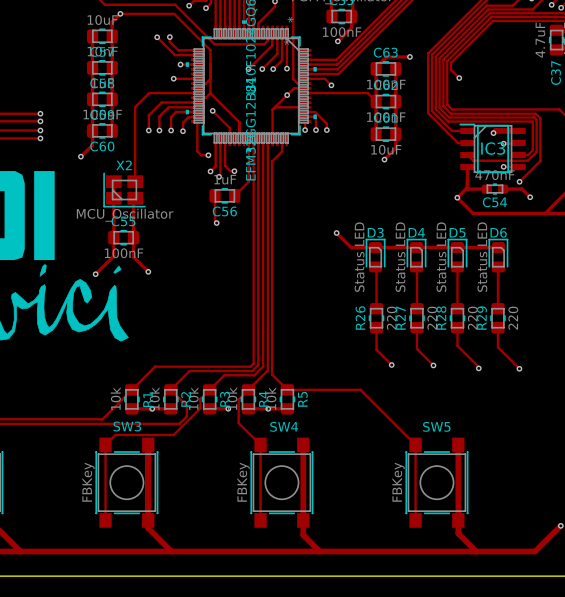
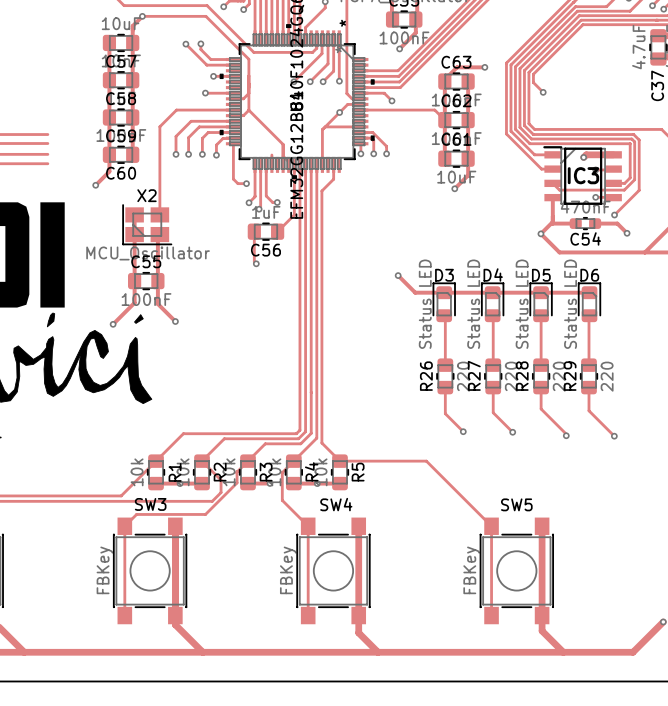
track: (212, 110) (229, 128) (229, 131) -> none
via: (212, 110) -> none
via: (40, 113) -> none
via: (40, 121) -> none
via: (40, 130) -> none
via: (40, 138) -> none

